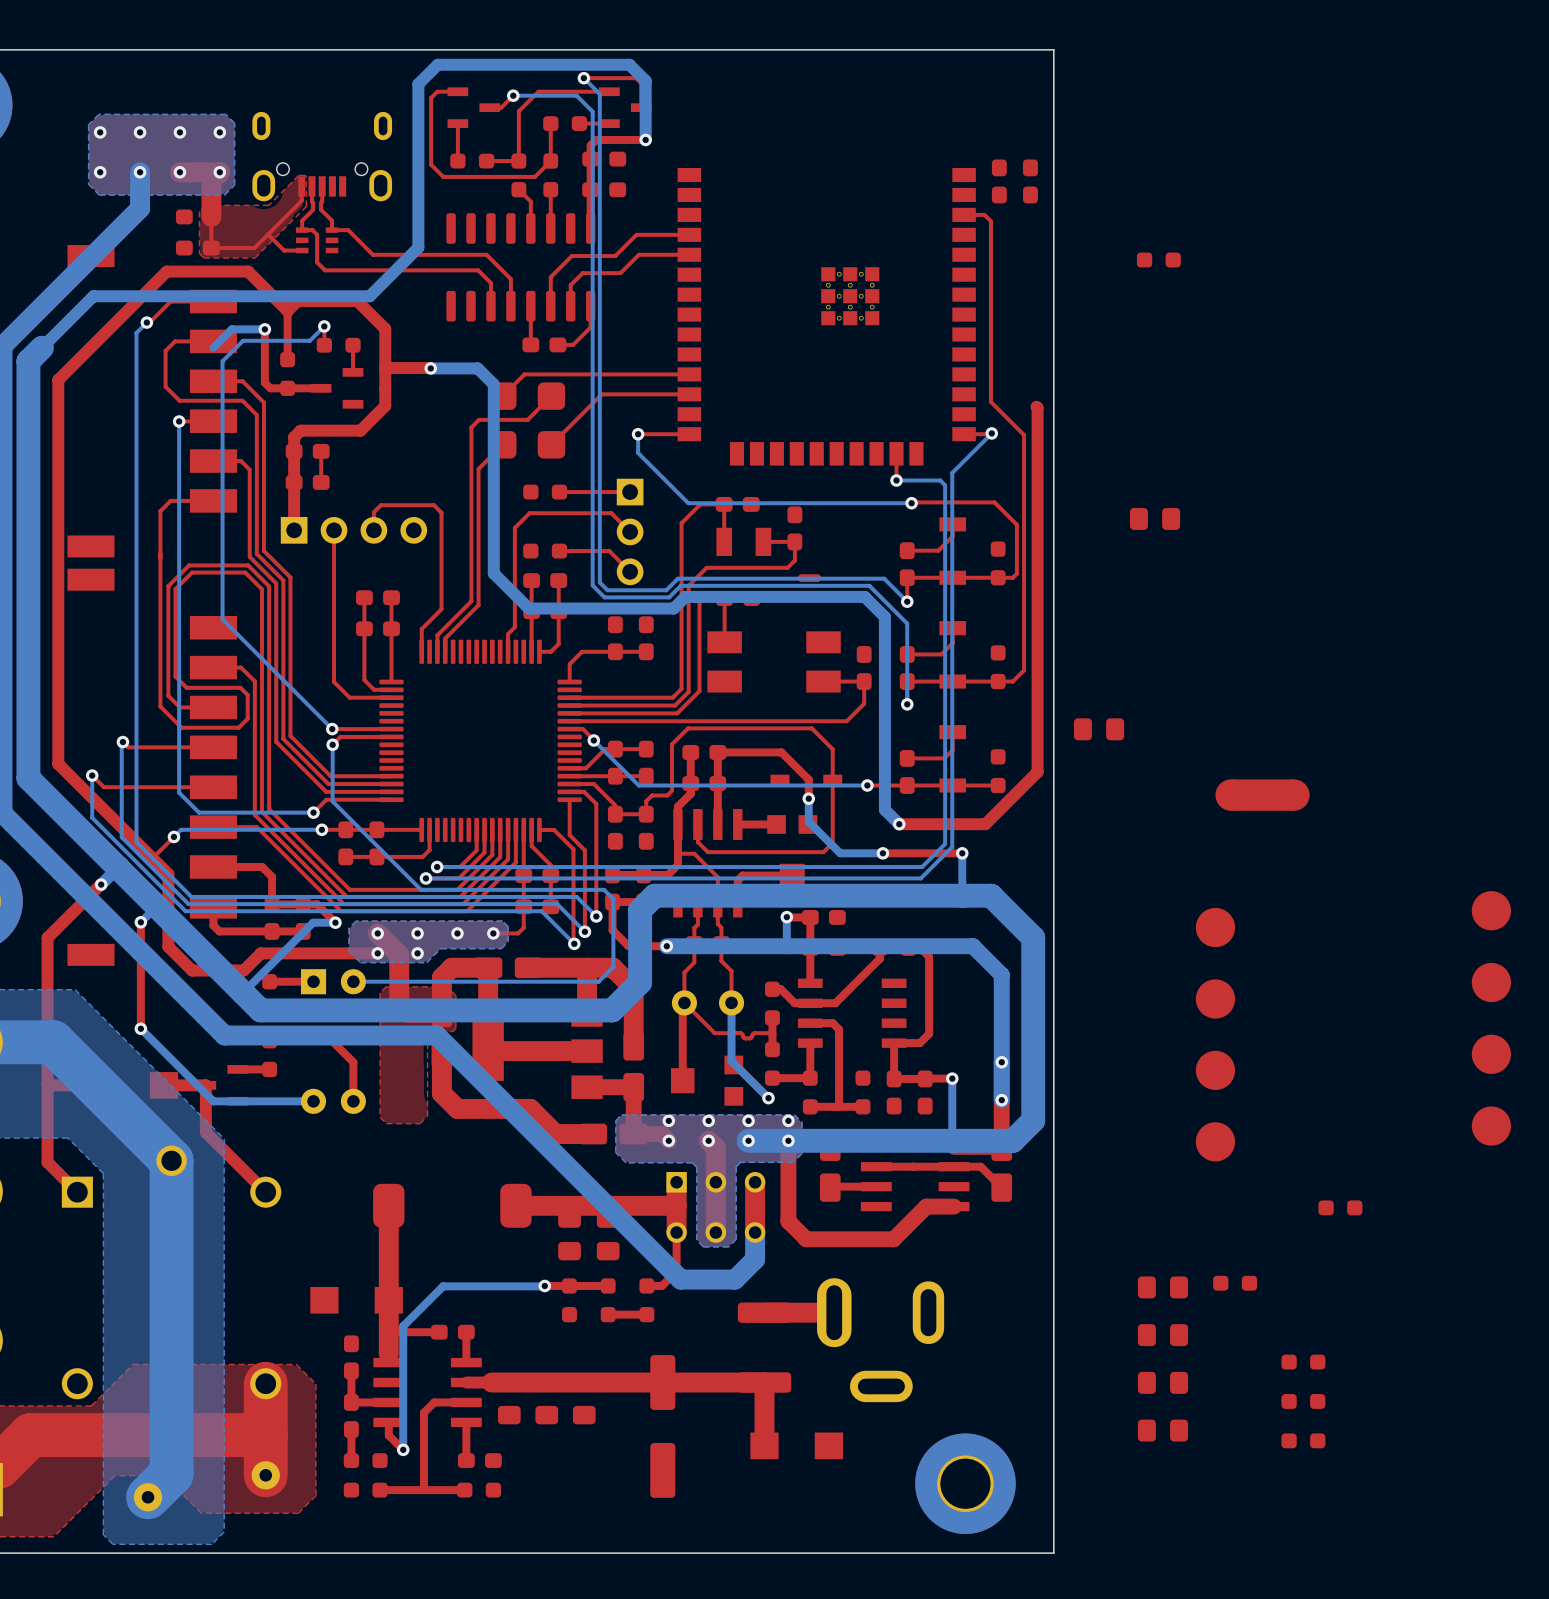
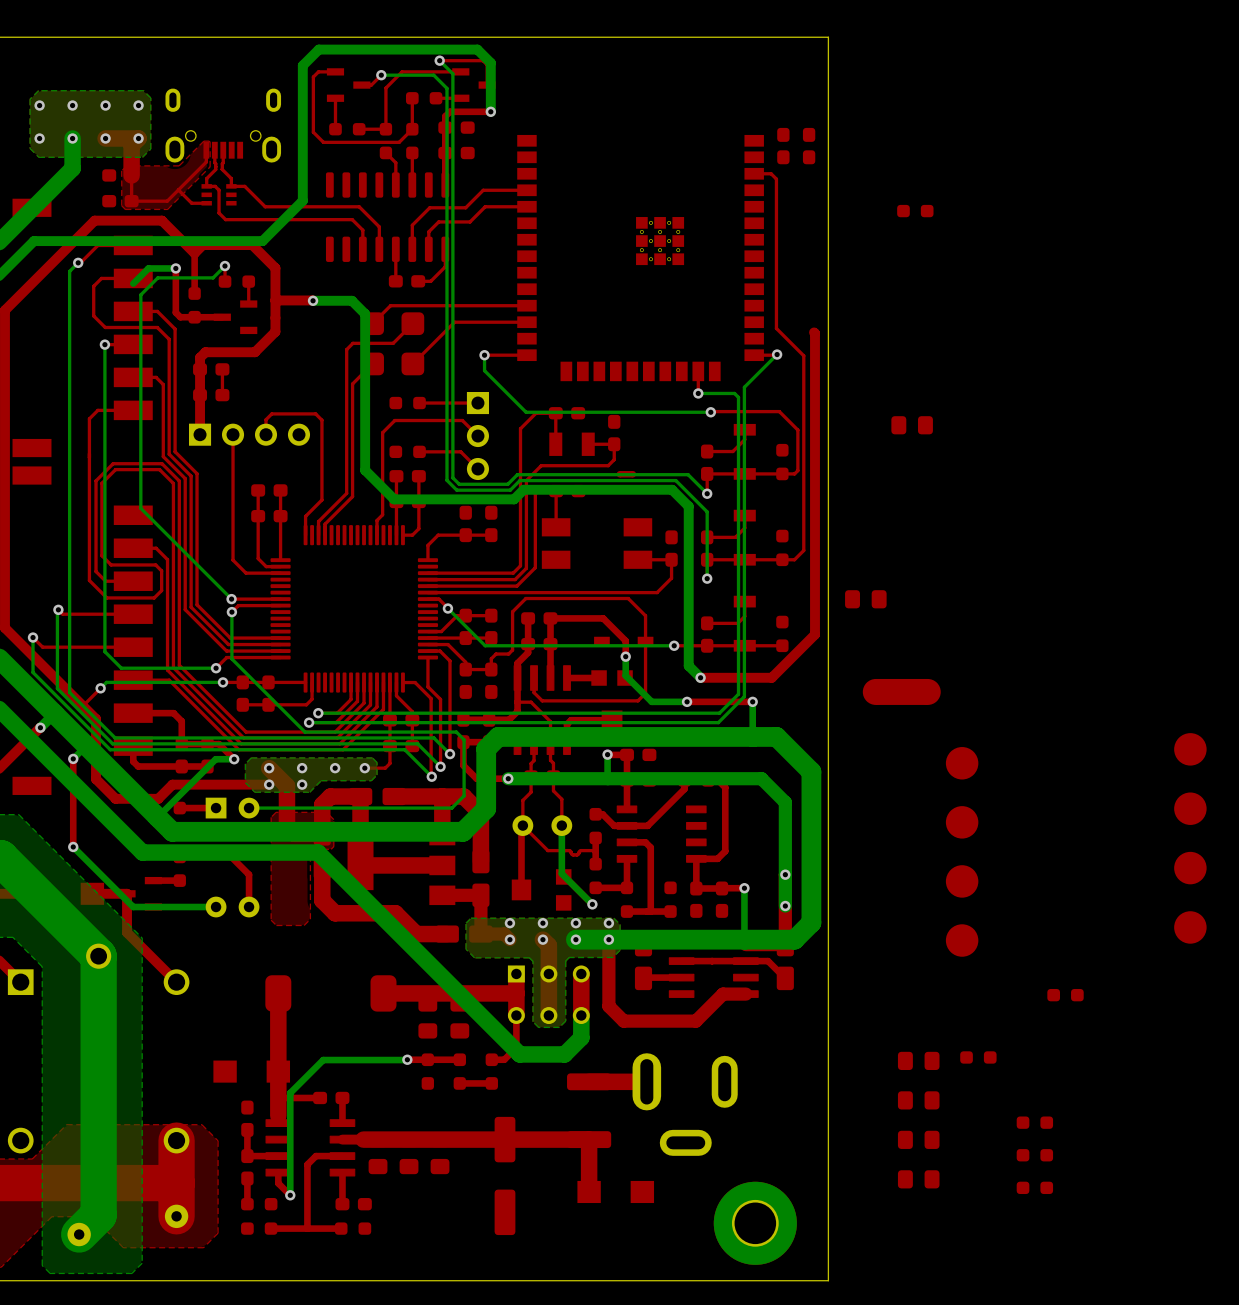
part position: (1262, 795) -> (901, 691)

